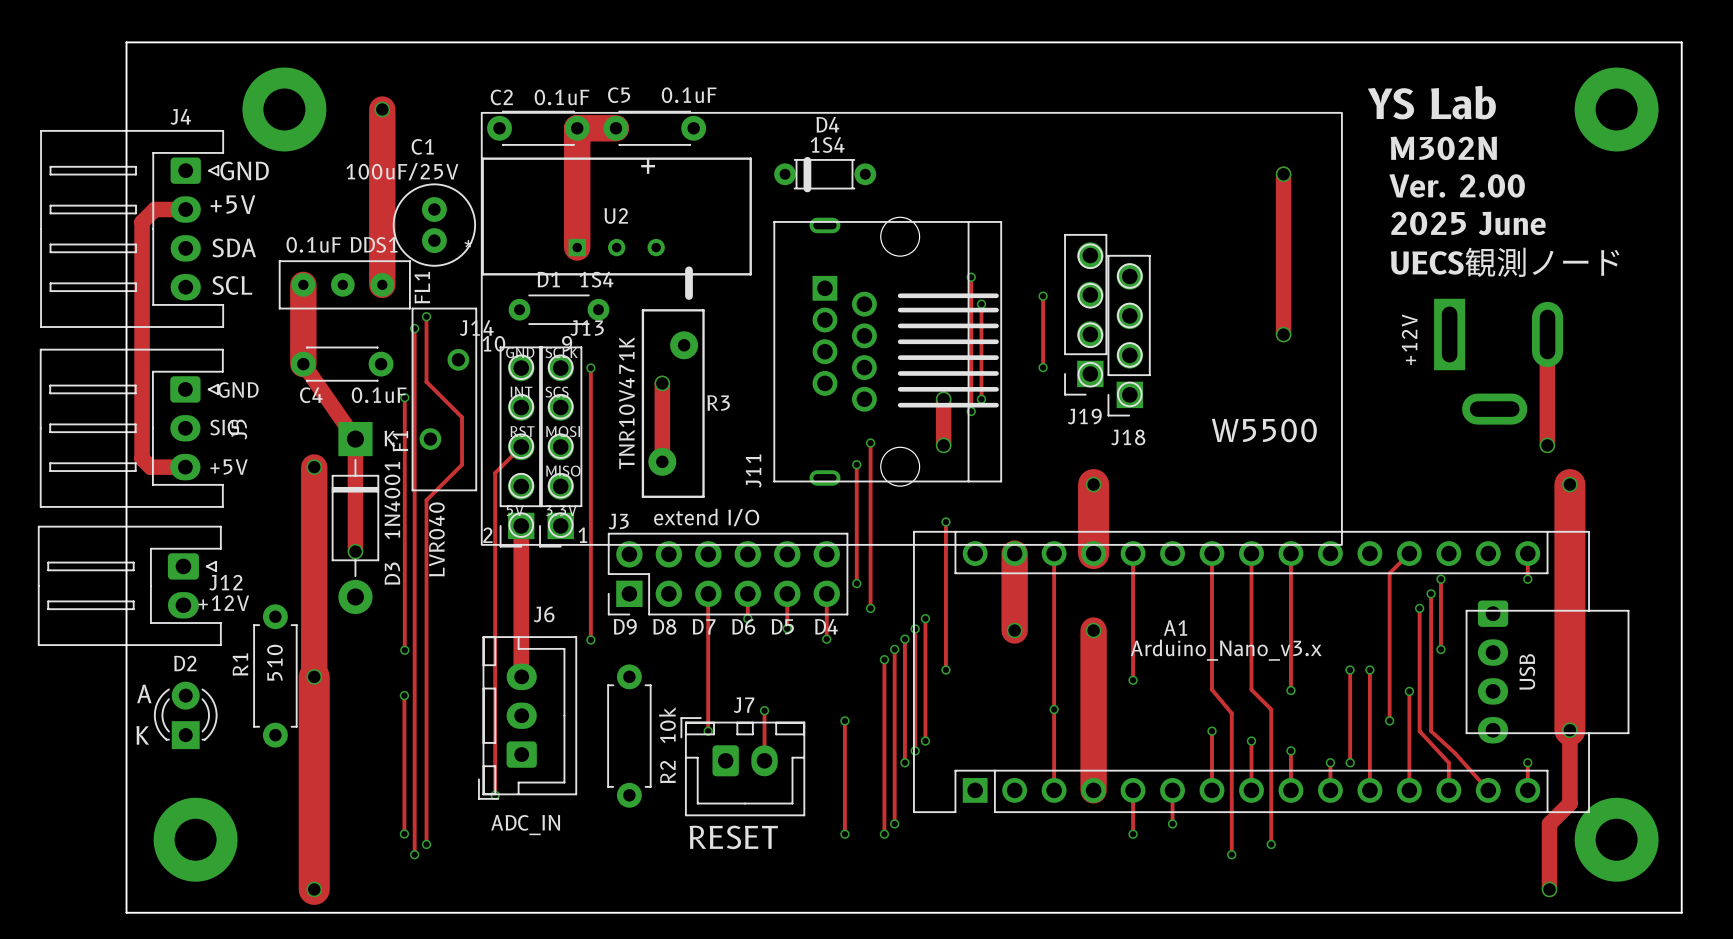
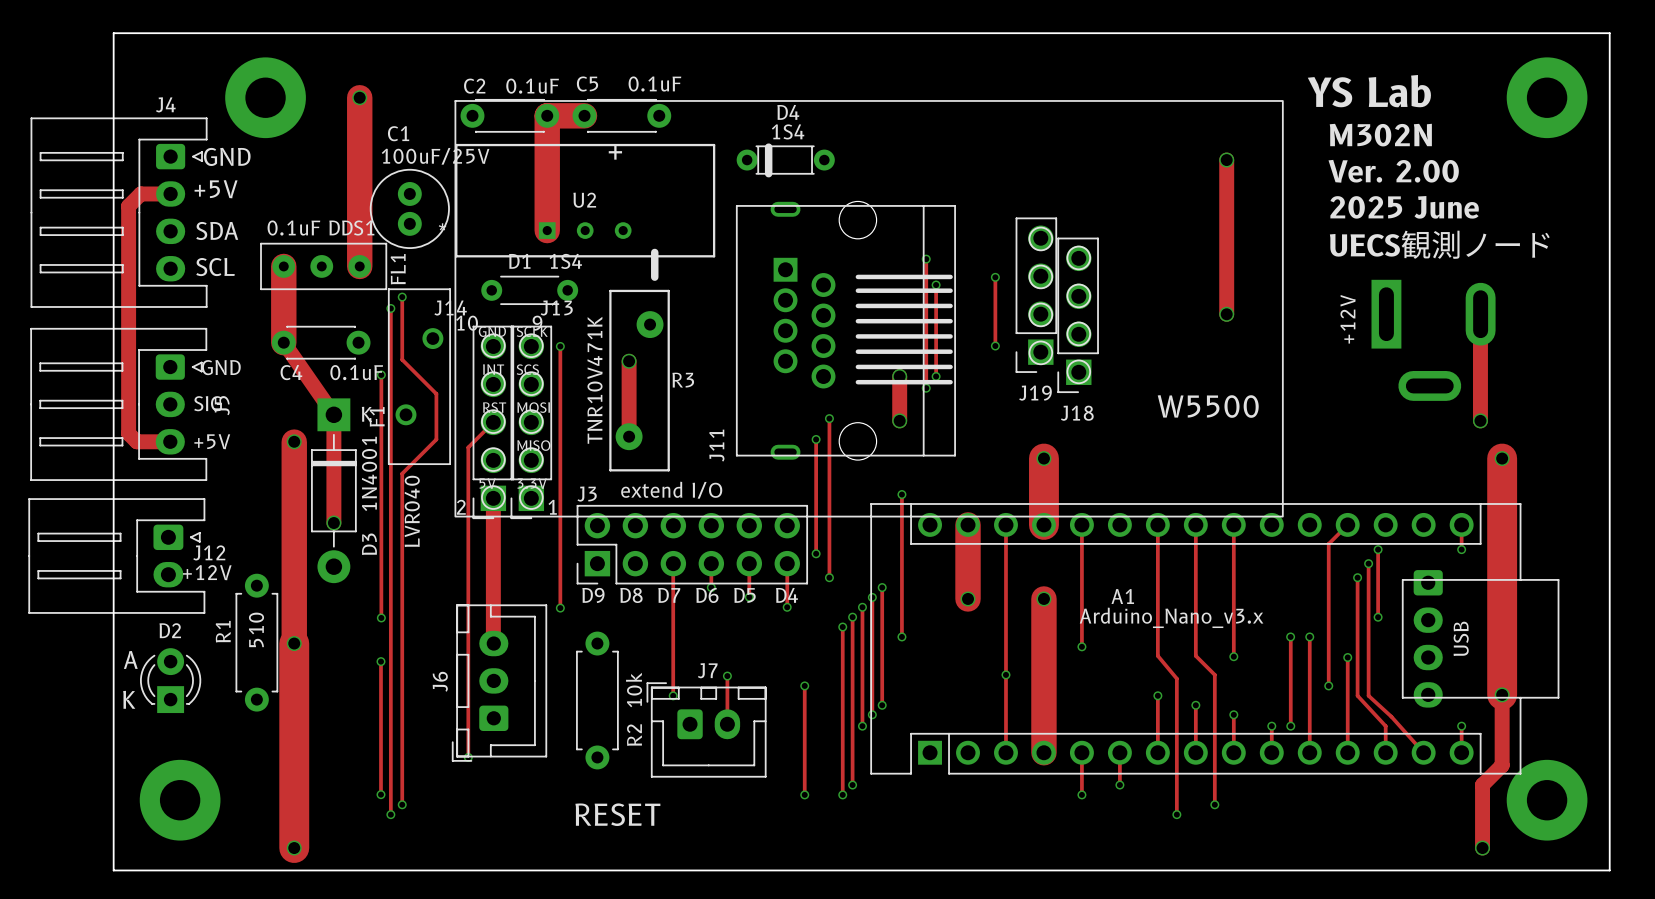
C1 value position: 100uF/25V (402, 171) -> 100uF/25V (435, 156)
J6 name rotation: 0° (544, 614) -> 90° counterclockwise (440, 681)
J6 name position: J6 (544, 614) -> J6 (440, 681)
J6 value: ADC_IN (525, 825) -> none
text position: RESET (733, 837) -> RESET (617, 814)

